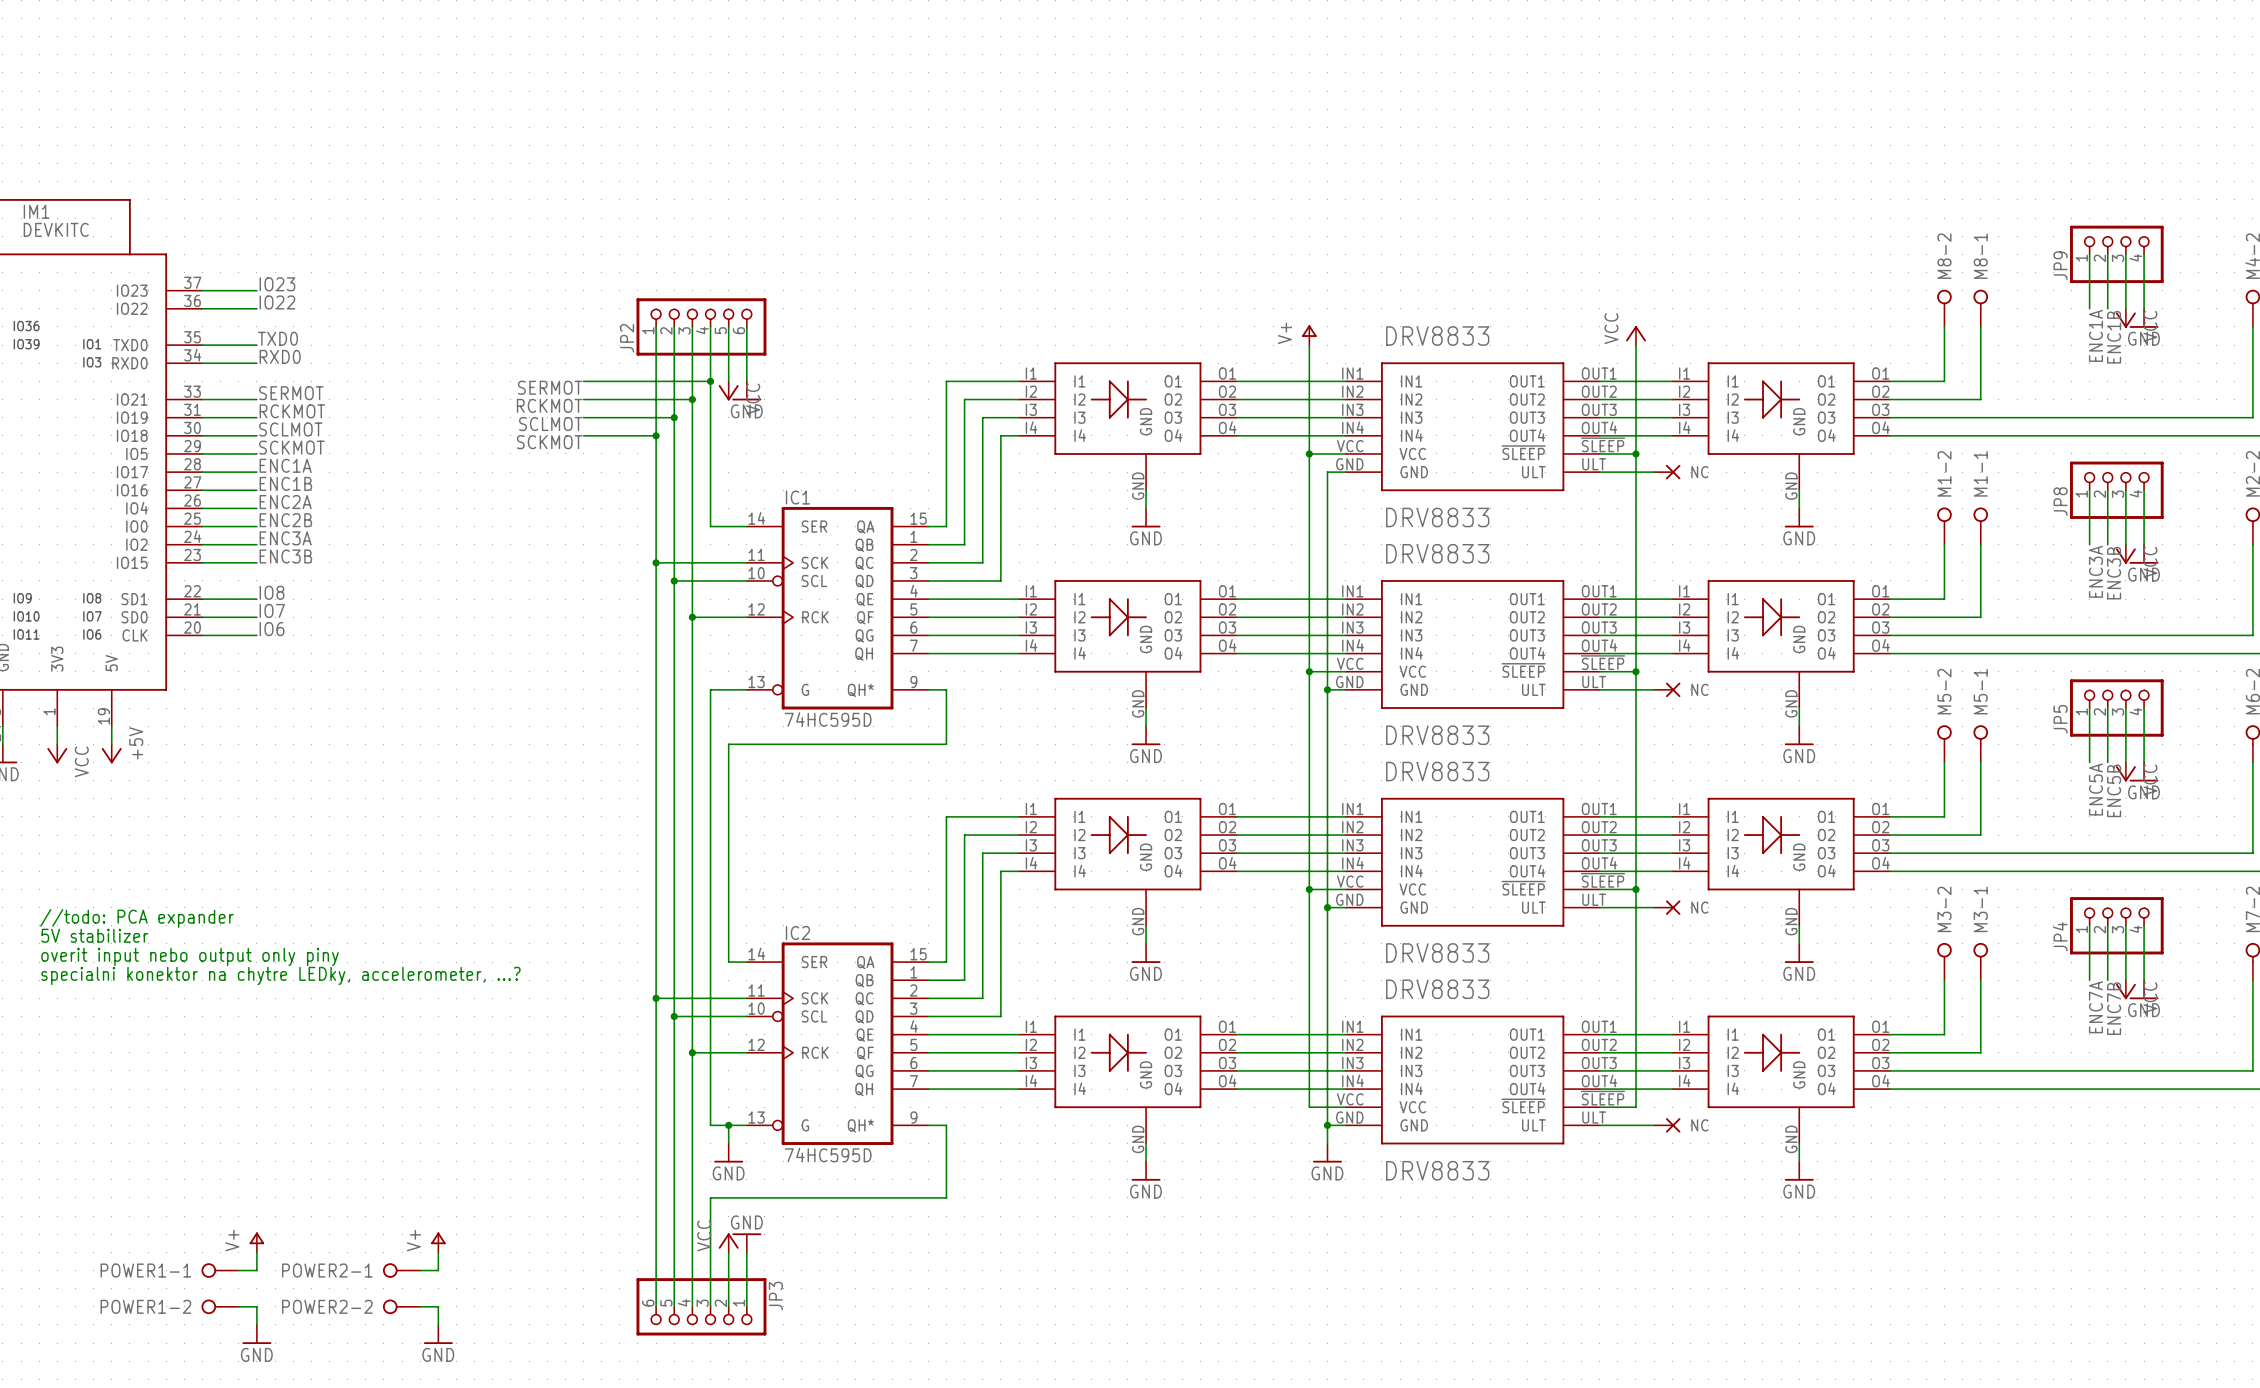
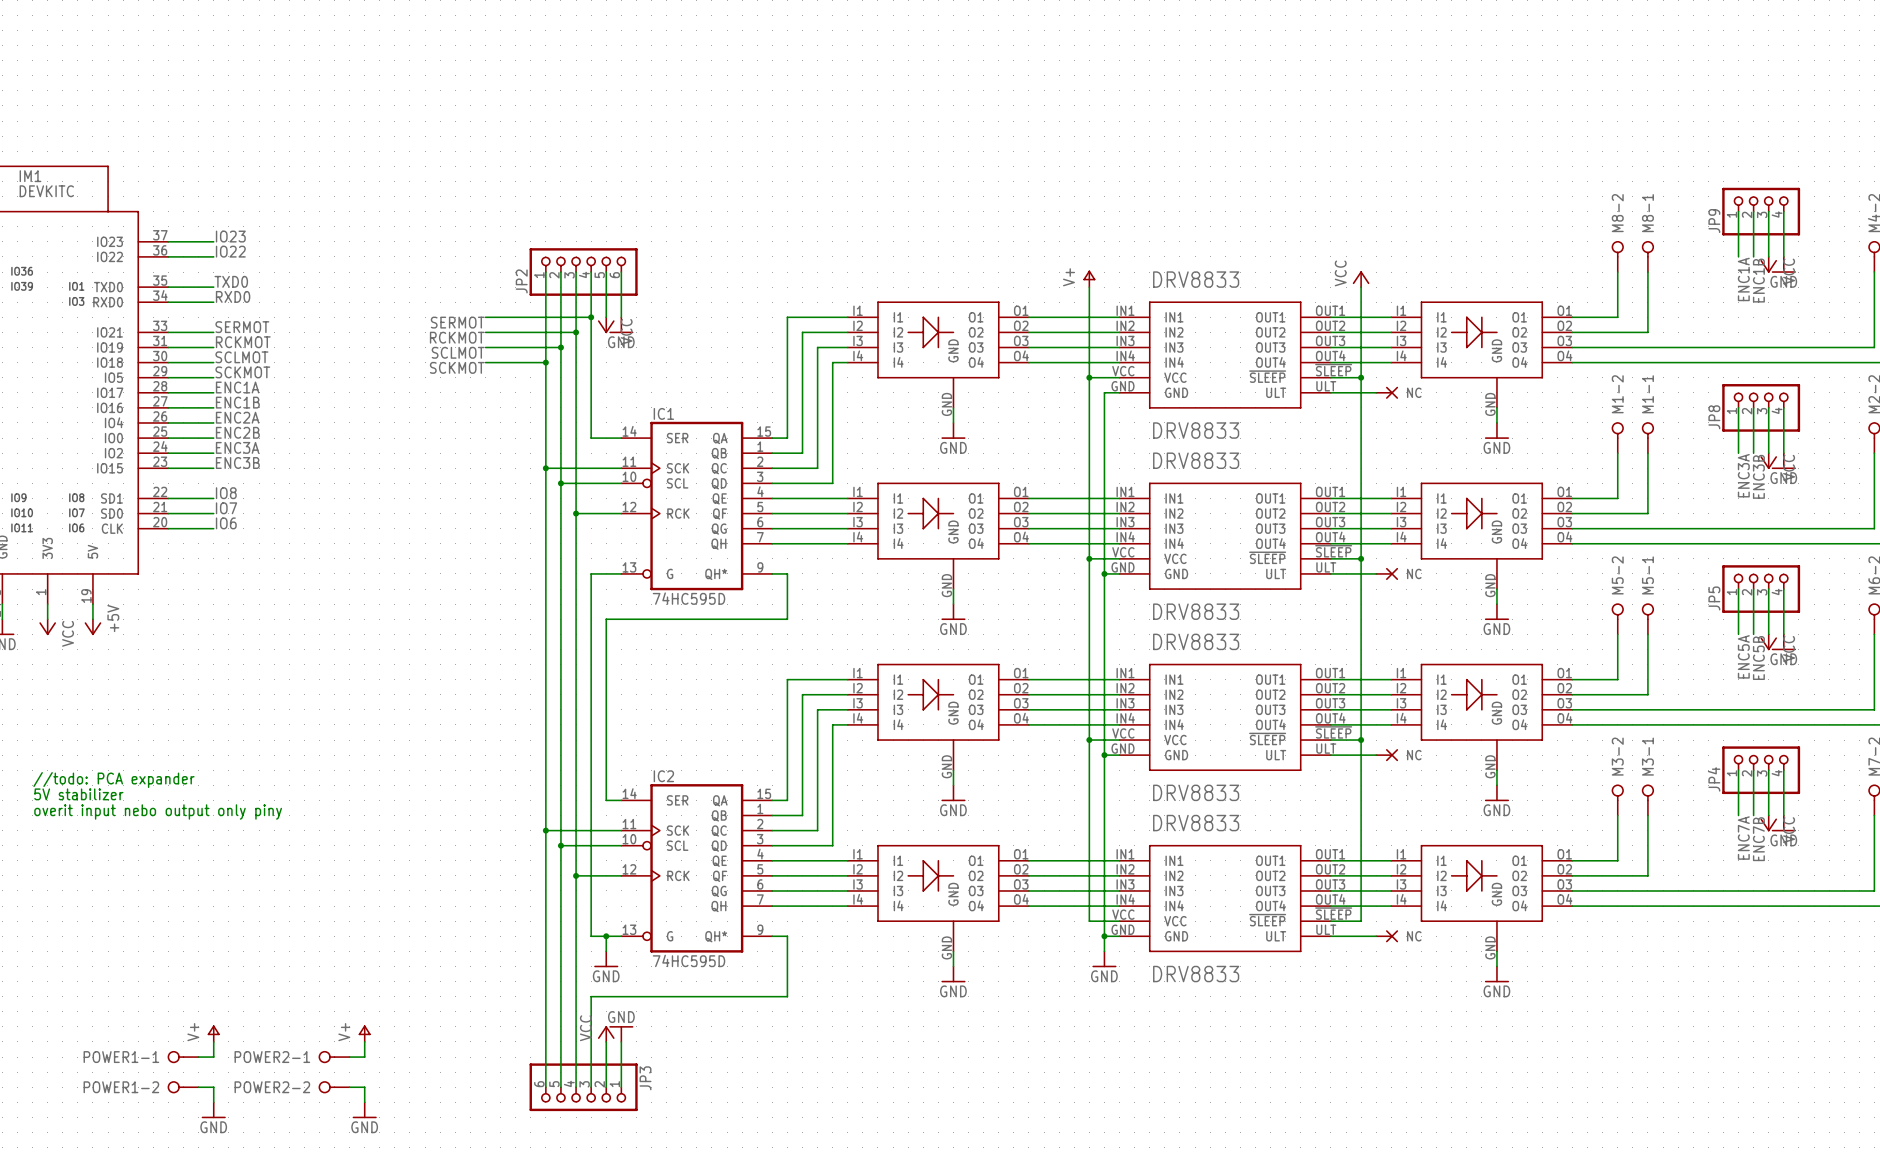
text: //todo: PCA expander (136, 918) -> none
text: 5V stabilizer (94, 935) -> //todo: PCA expander (113, 780)
text: overit input nebo output only piny (190, 956) -> 5V stabilizer (78, 794)
text: specialni konektor na chytre LEDky, accelerometer, ...? (280, 975) -> overit input nebo output only piny (158, 811)

